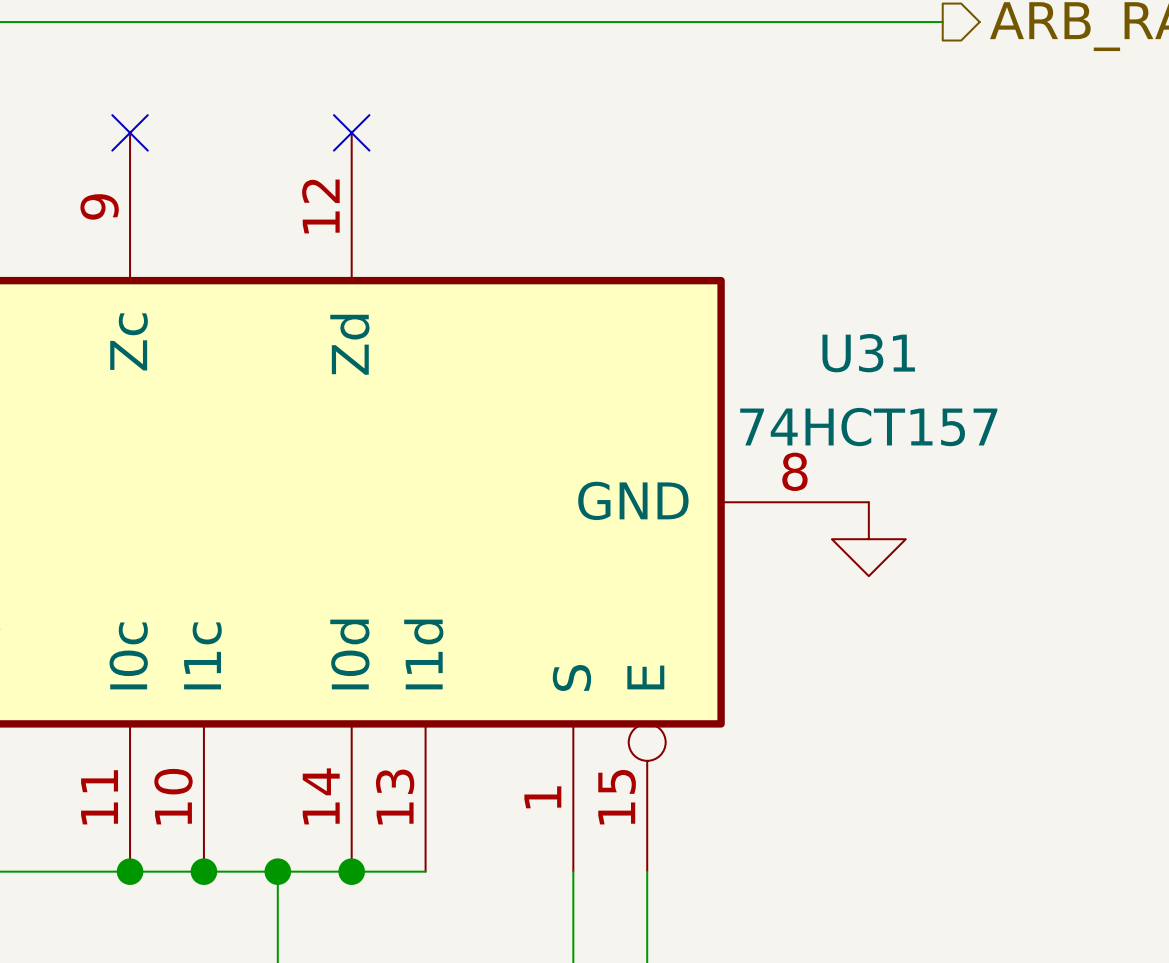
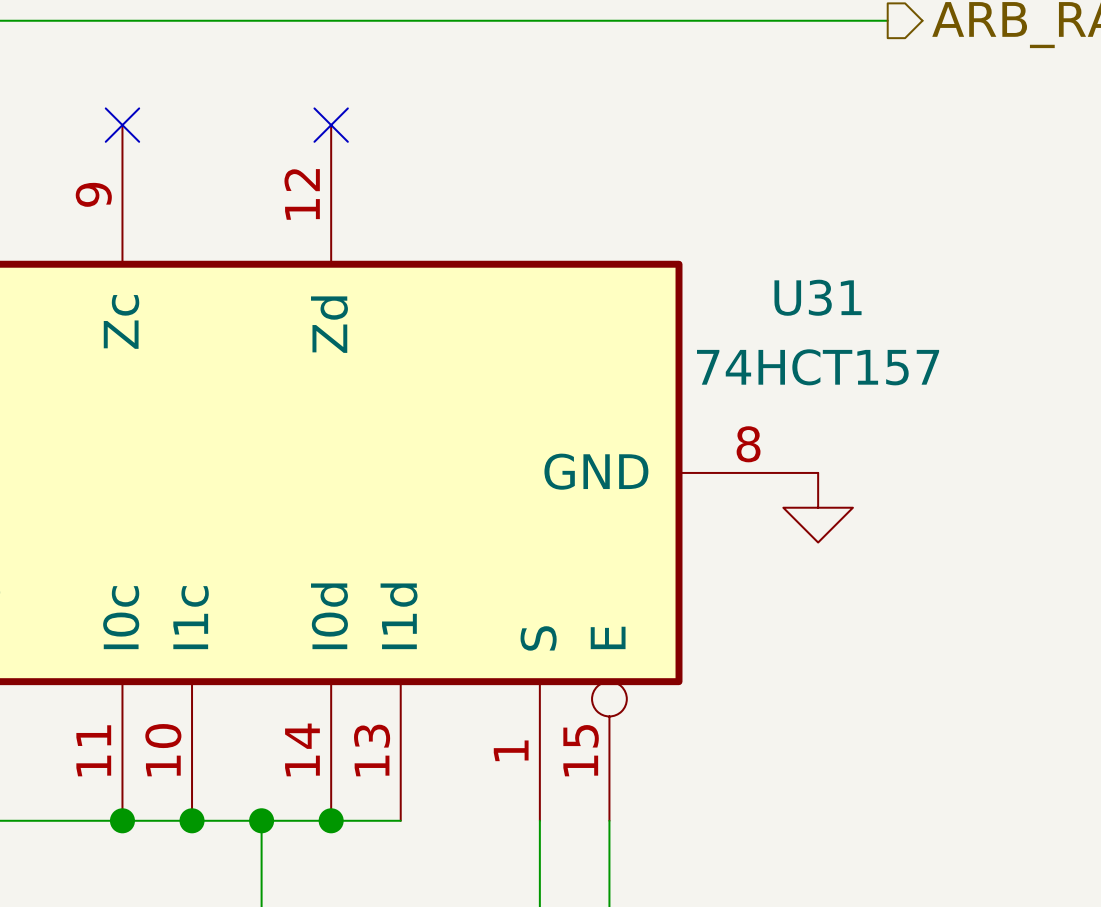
U31 name position: U31 (868, 353) -> U31 (818, 297)
U31 value position: 74HCT157 (868, 427) -> 74HCT157 (818, 367)

